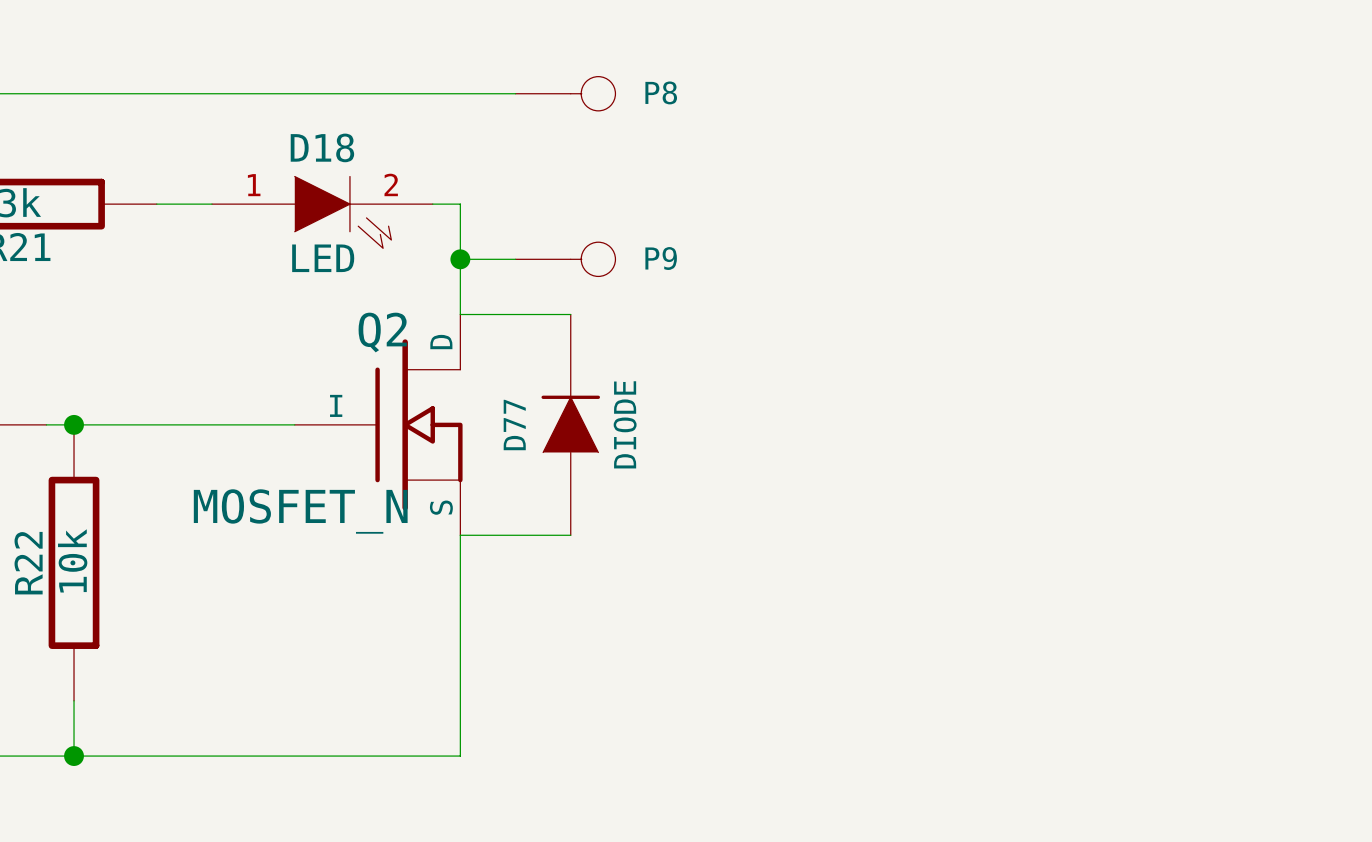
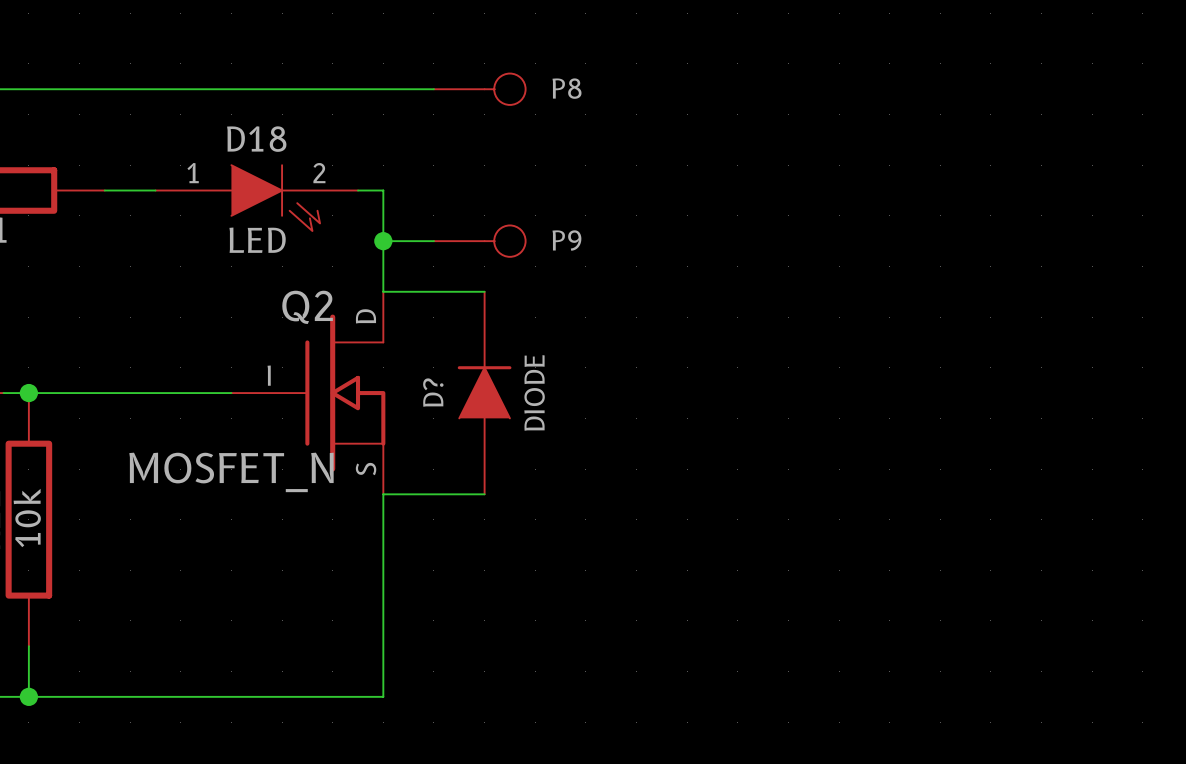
D77 name: D77 (514, 425) -> D? (433, 392)

